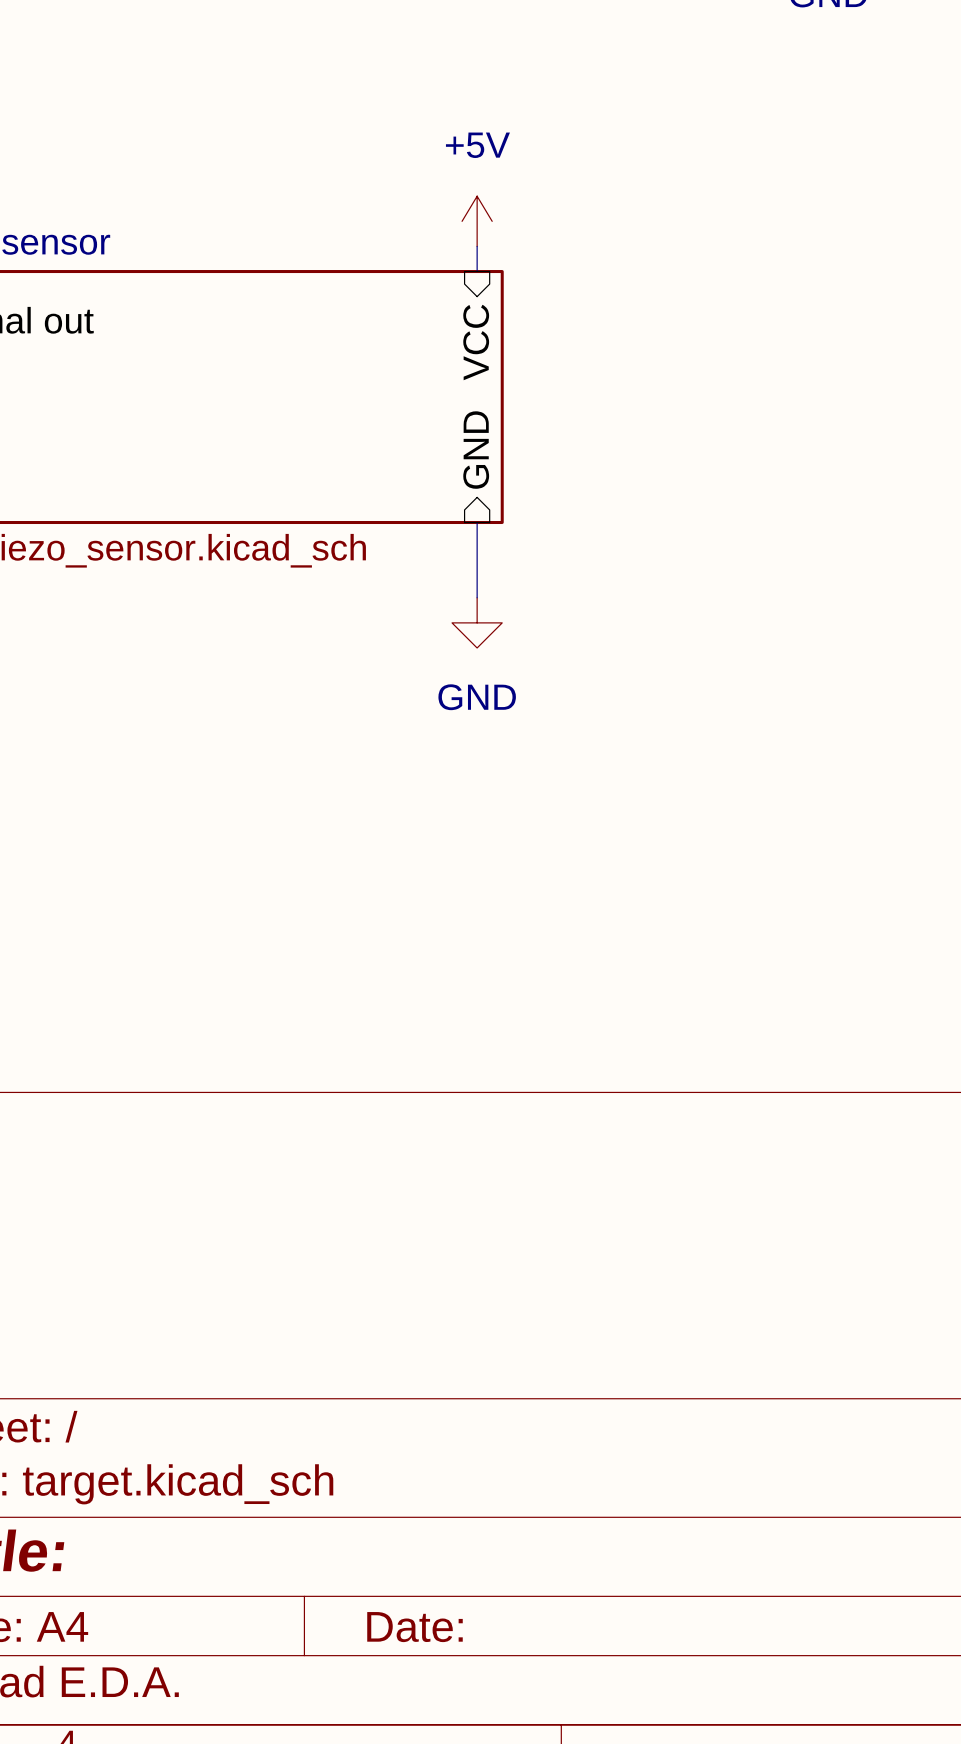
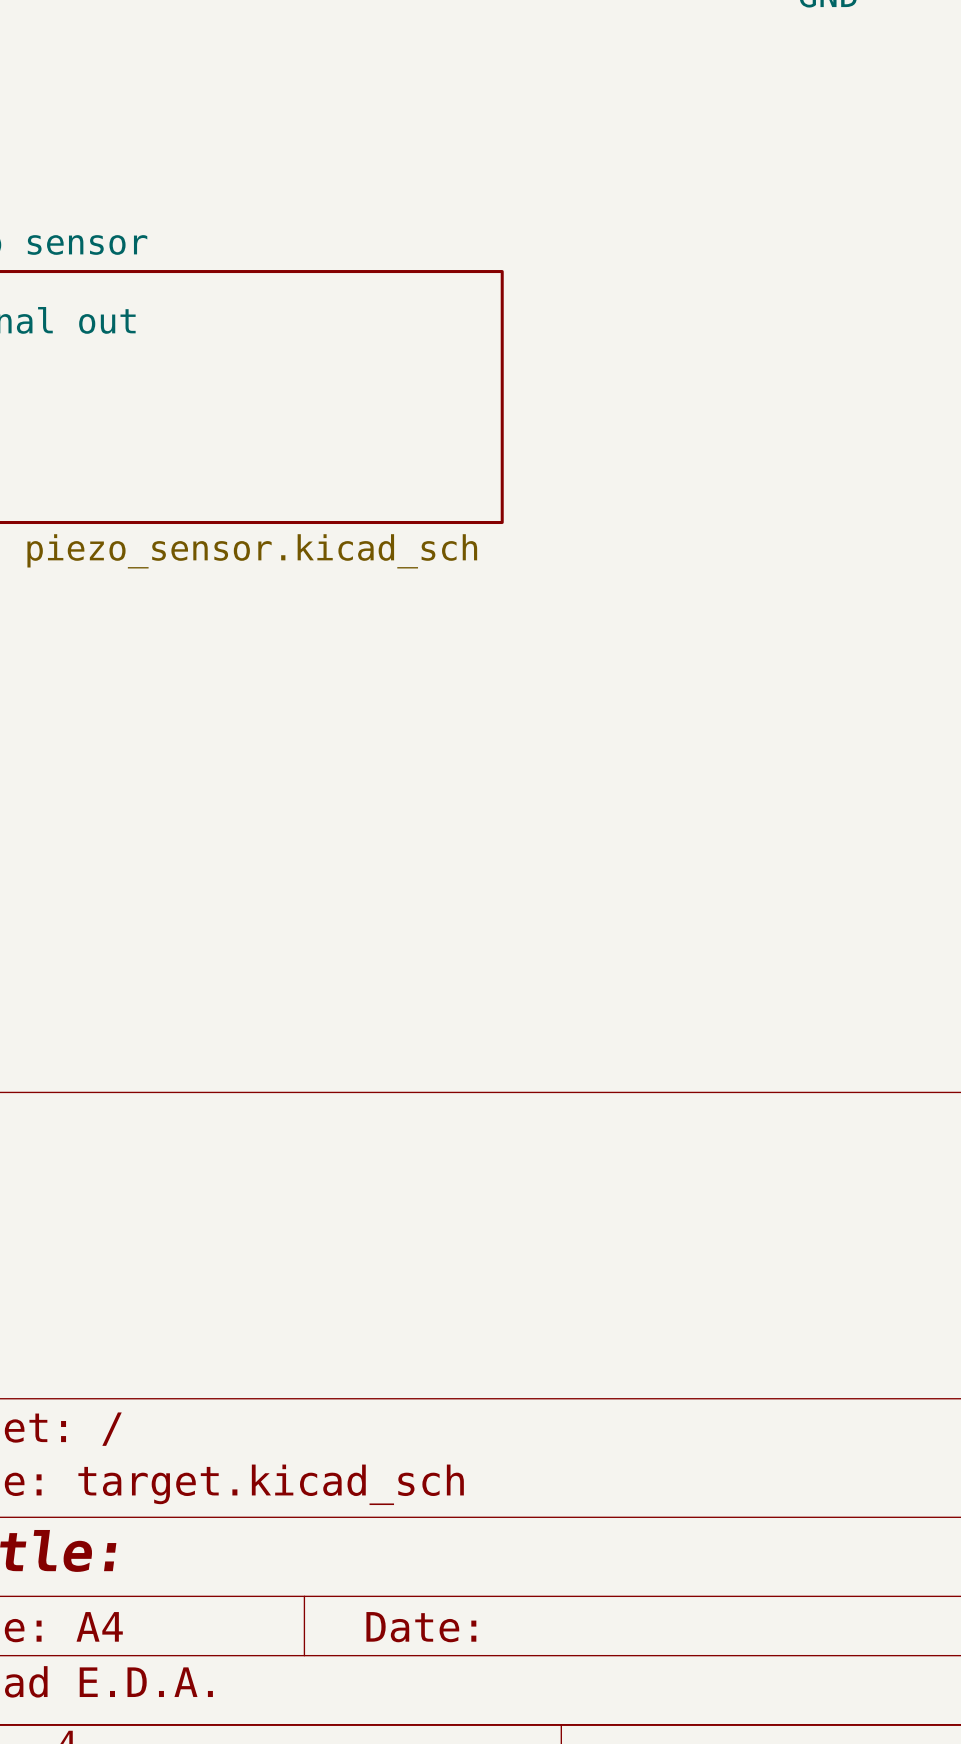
power symbol: +5V (477, 221) -> none
wire: (477, 246) (477, 271) -> none
sheet pin: VCC (476, 342) -> none
sheet pin: GND (476, 450) -> none
wire: (477, 522) (477, 597) -> none
power symbol: GND (477, 622) -> none

